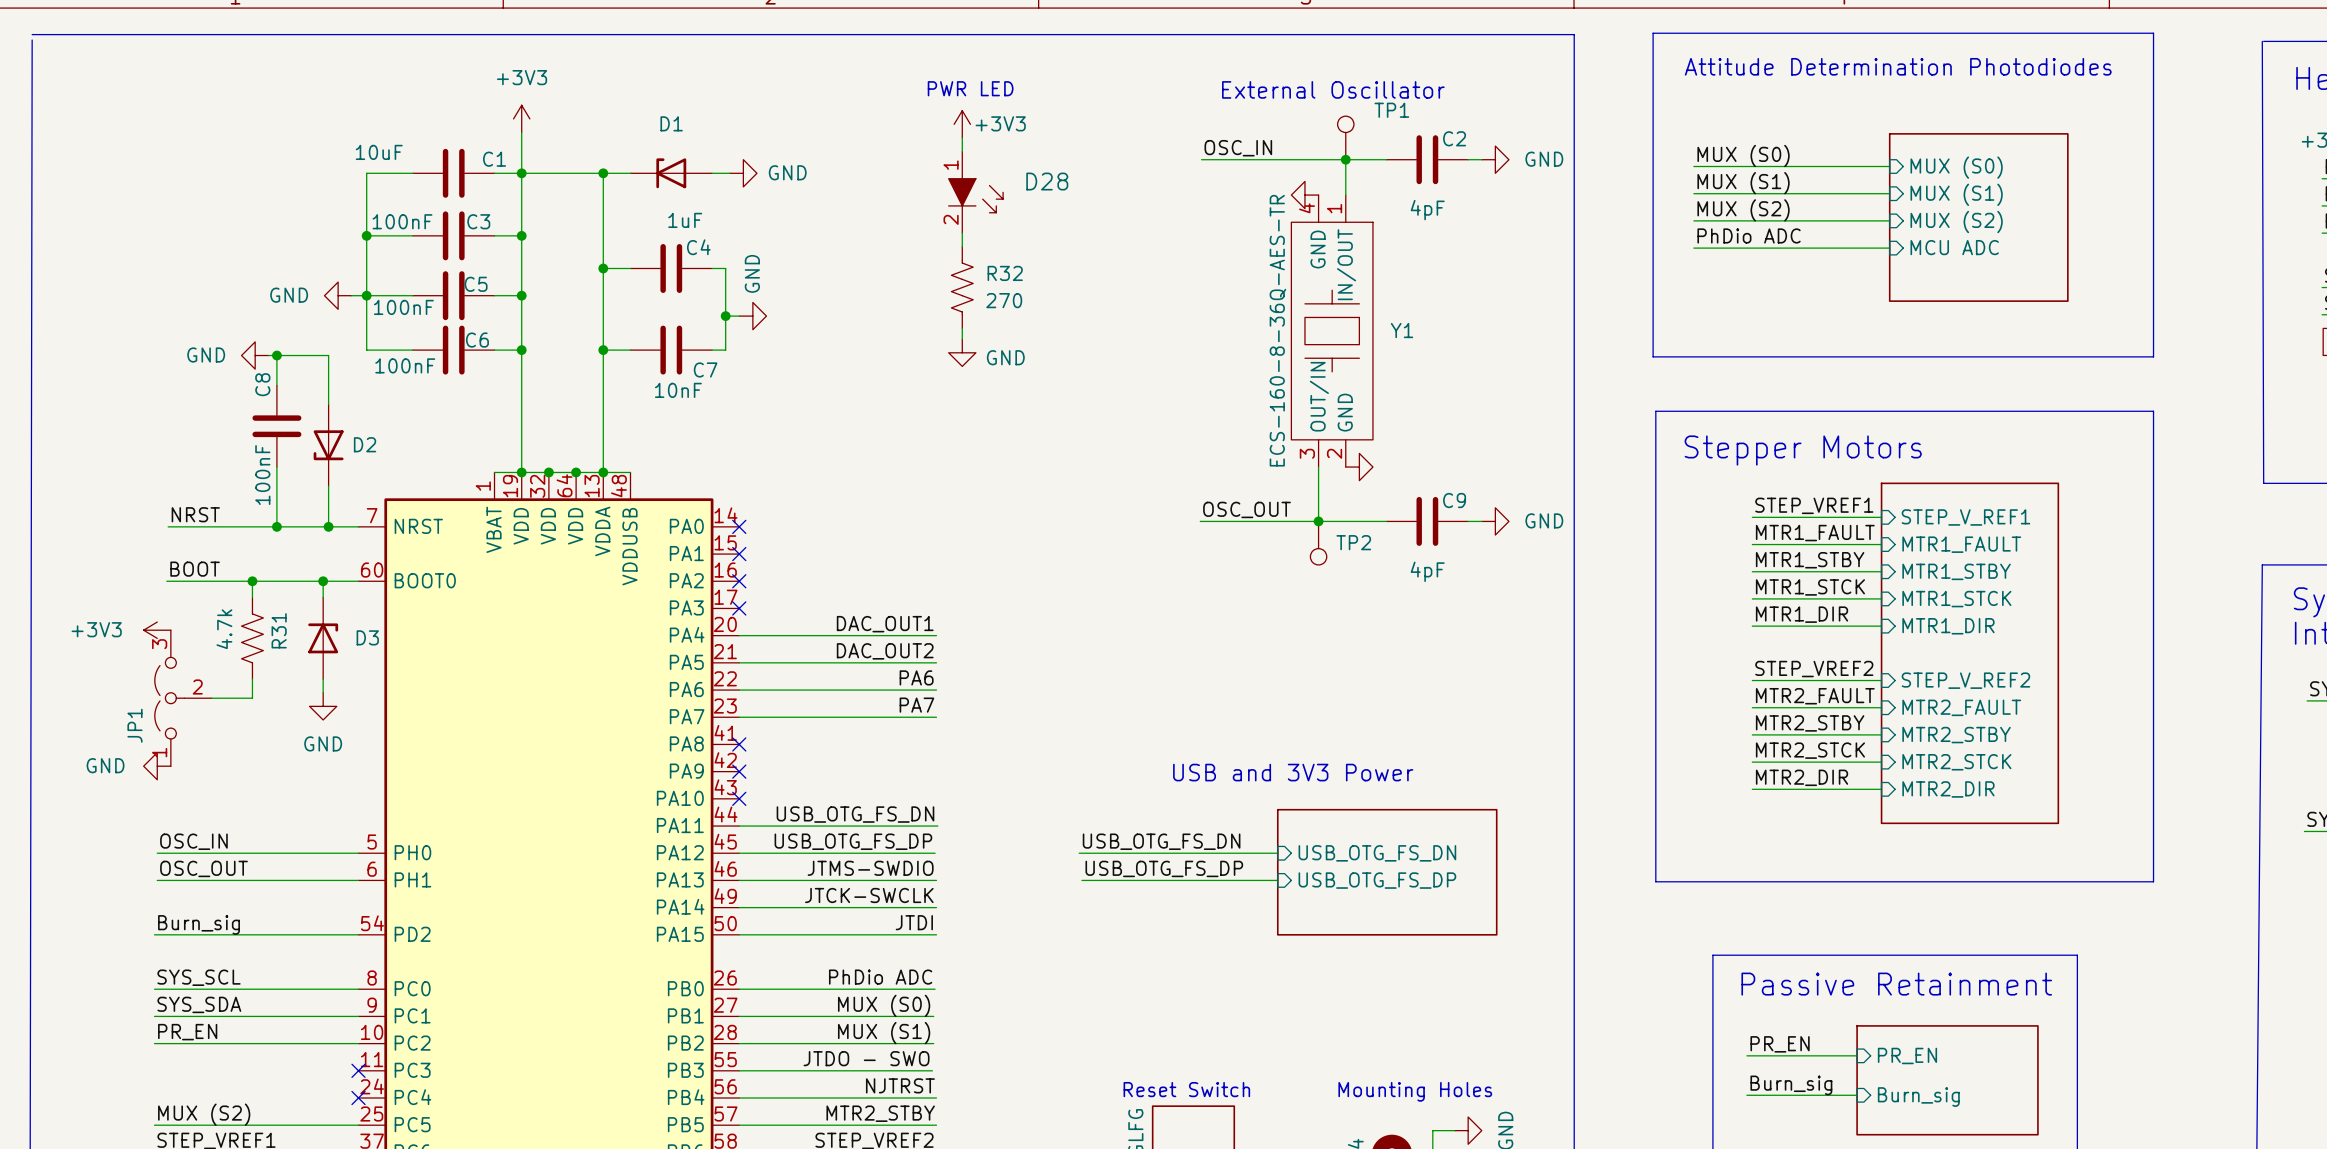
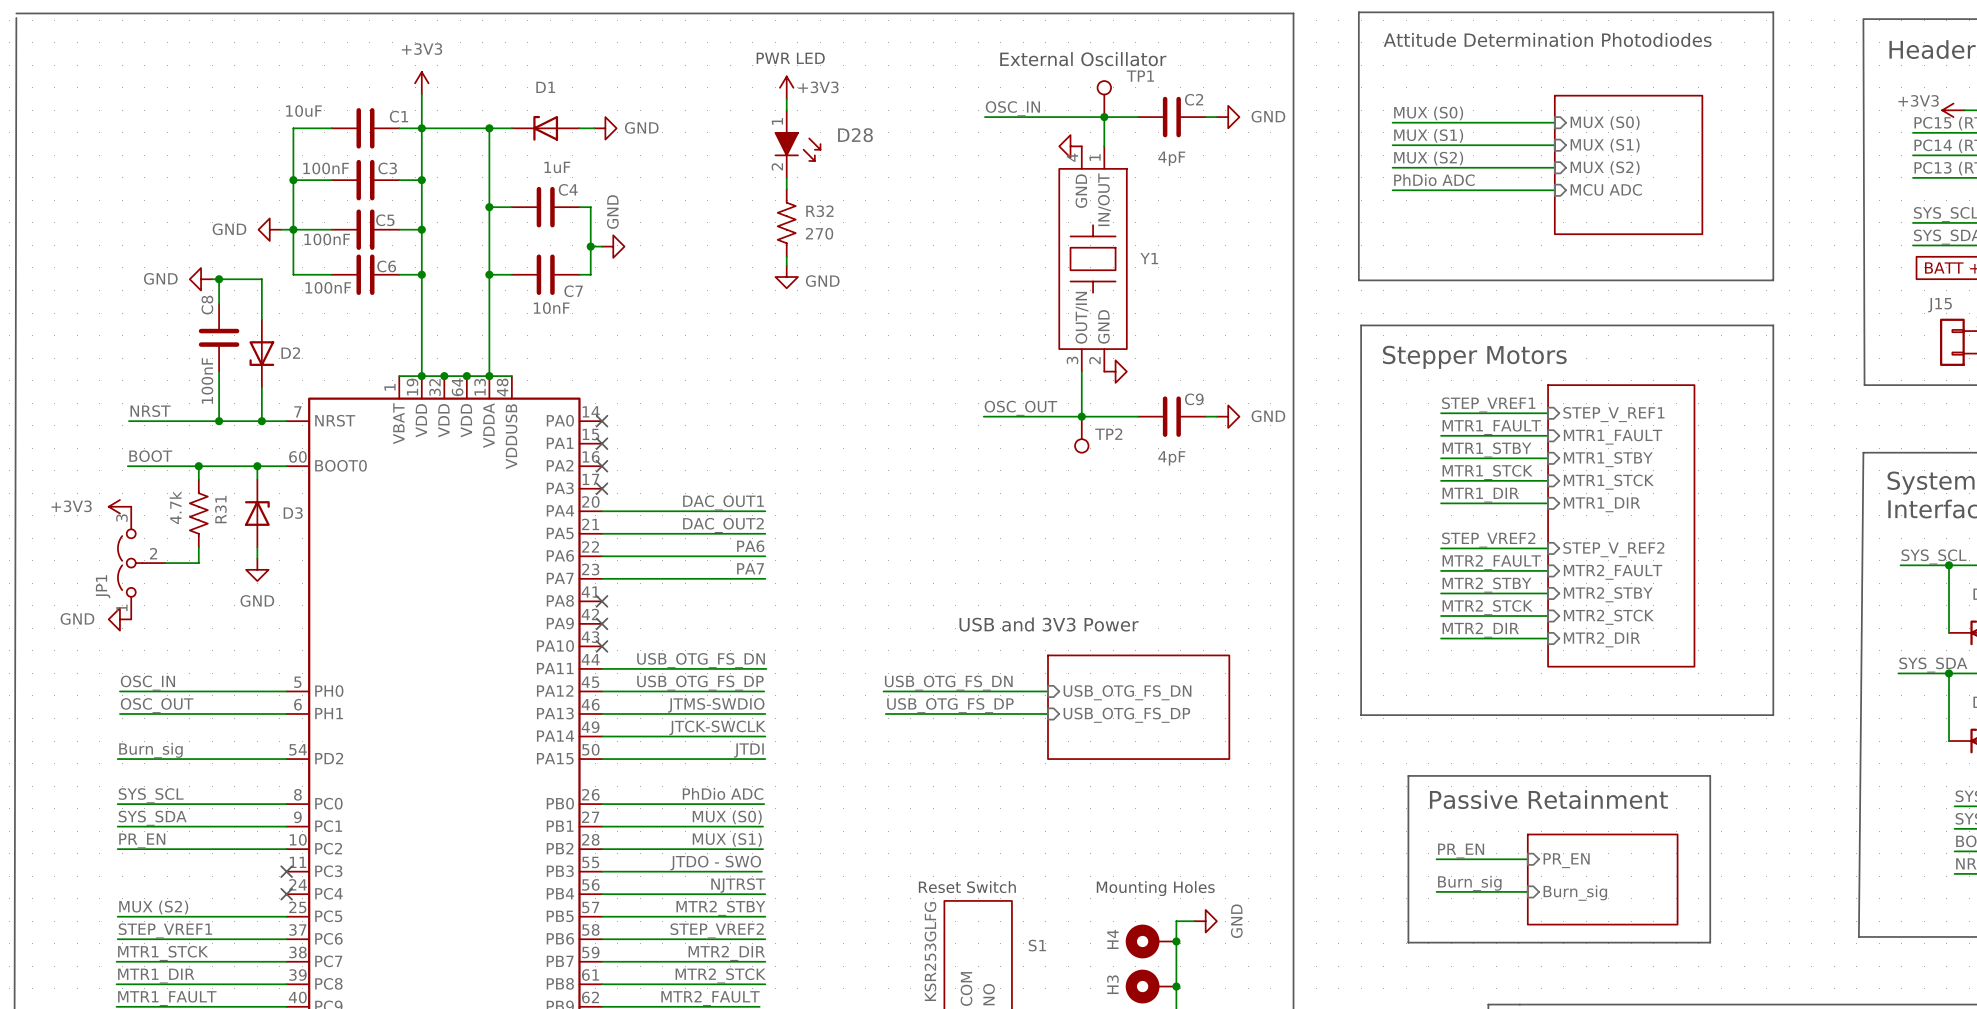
Y1 value: ECS-160-8-36Q-AES-TR (1277, 330) -> none

